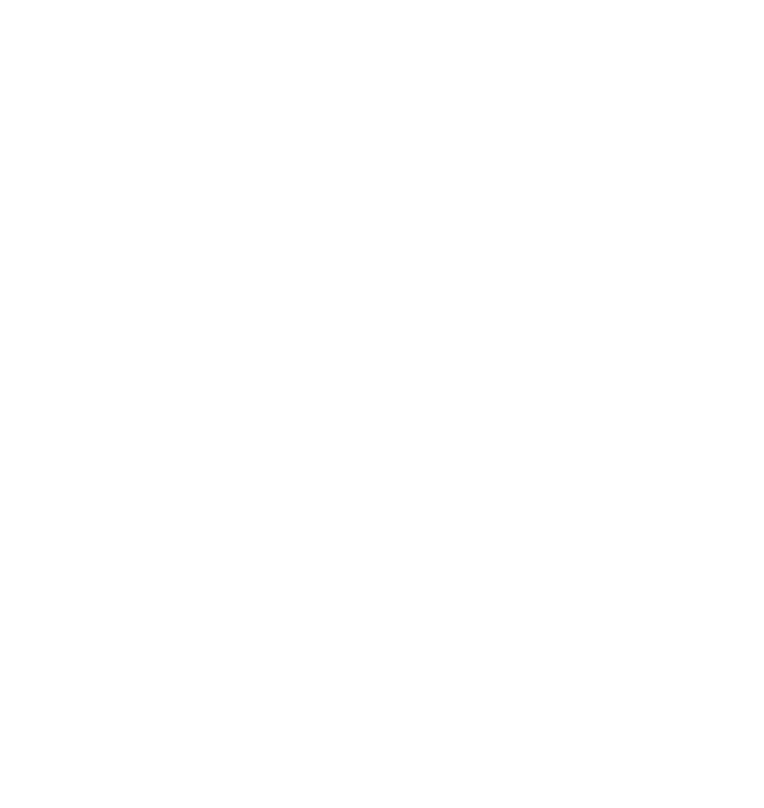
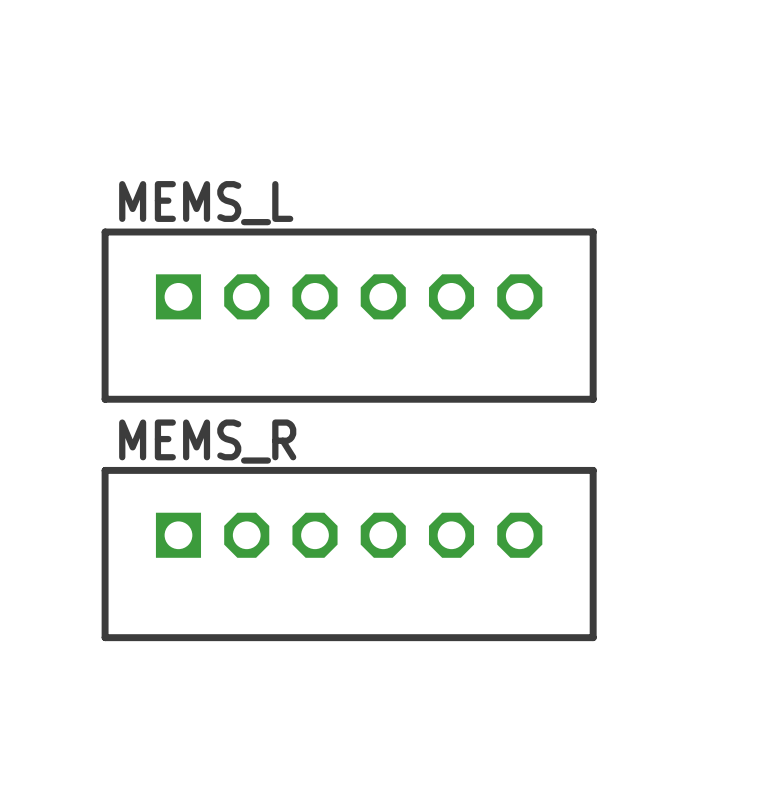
MEMS_L: none -> (349, 315)
MEMS_R: none -> (349, 554)

